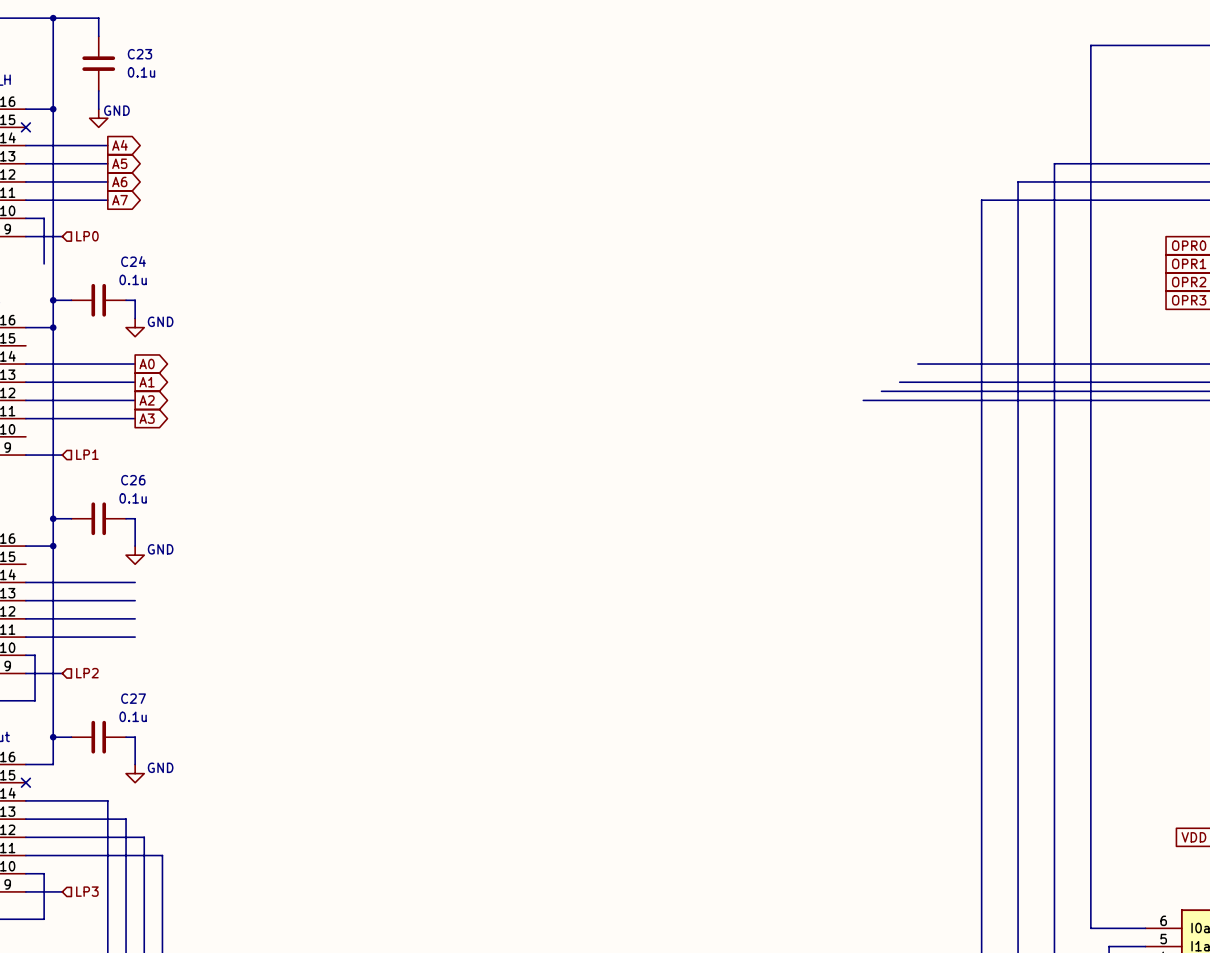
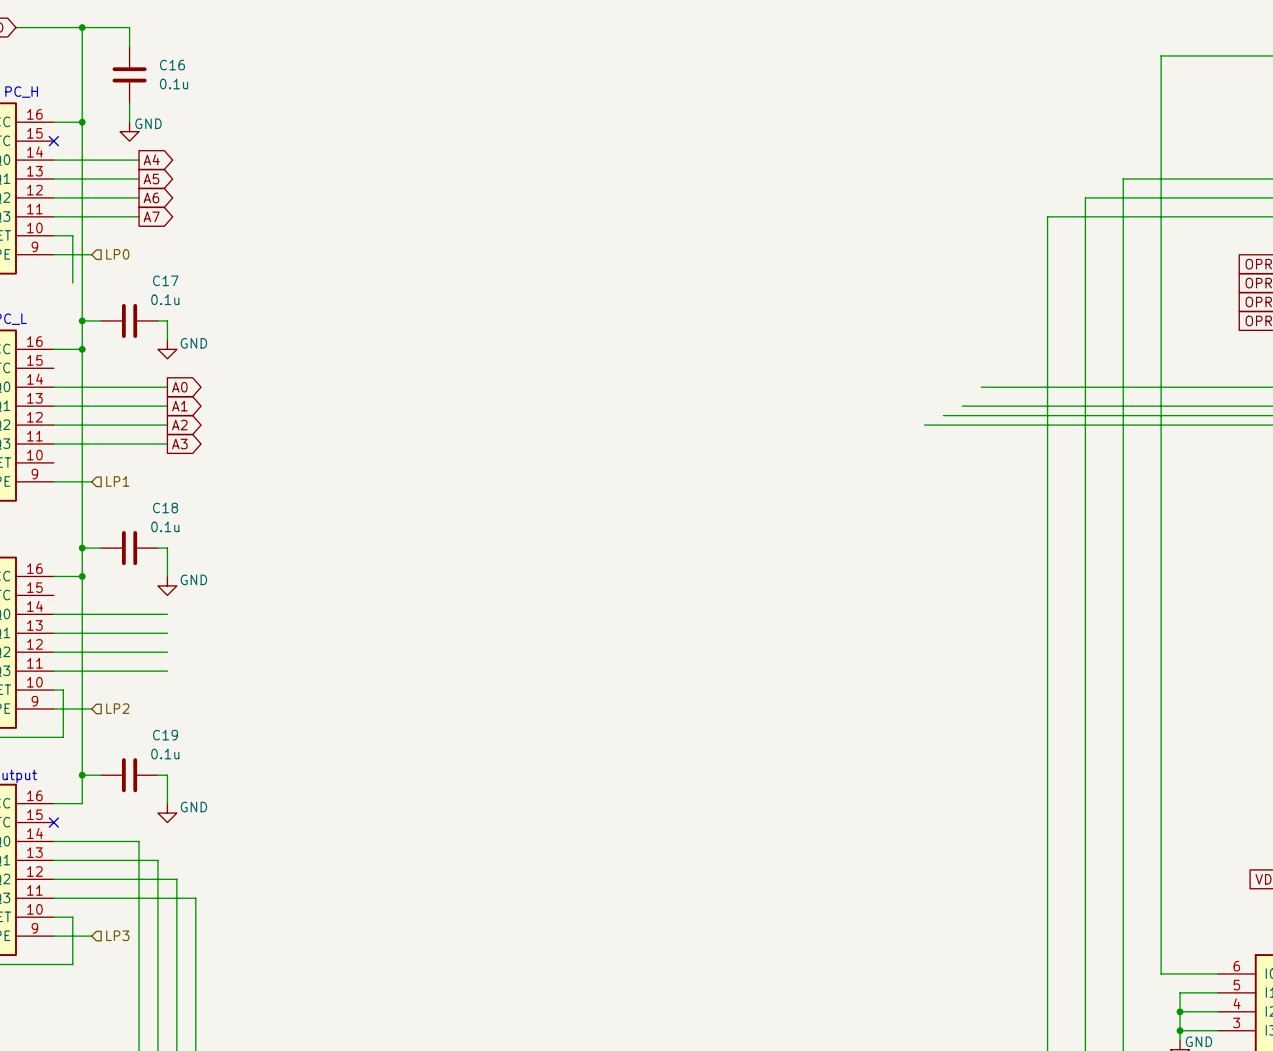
C23 name: C23 (139, 54) -> C16 (172, 65)
C24 name: C24 (133, 261) -> C17 (165, 280)
C26 name: C26 (133, 480) -> C18 (165, 507)
C27 name: C27 (133, 698) -> C19 (165, 735)

